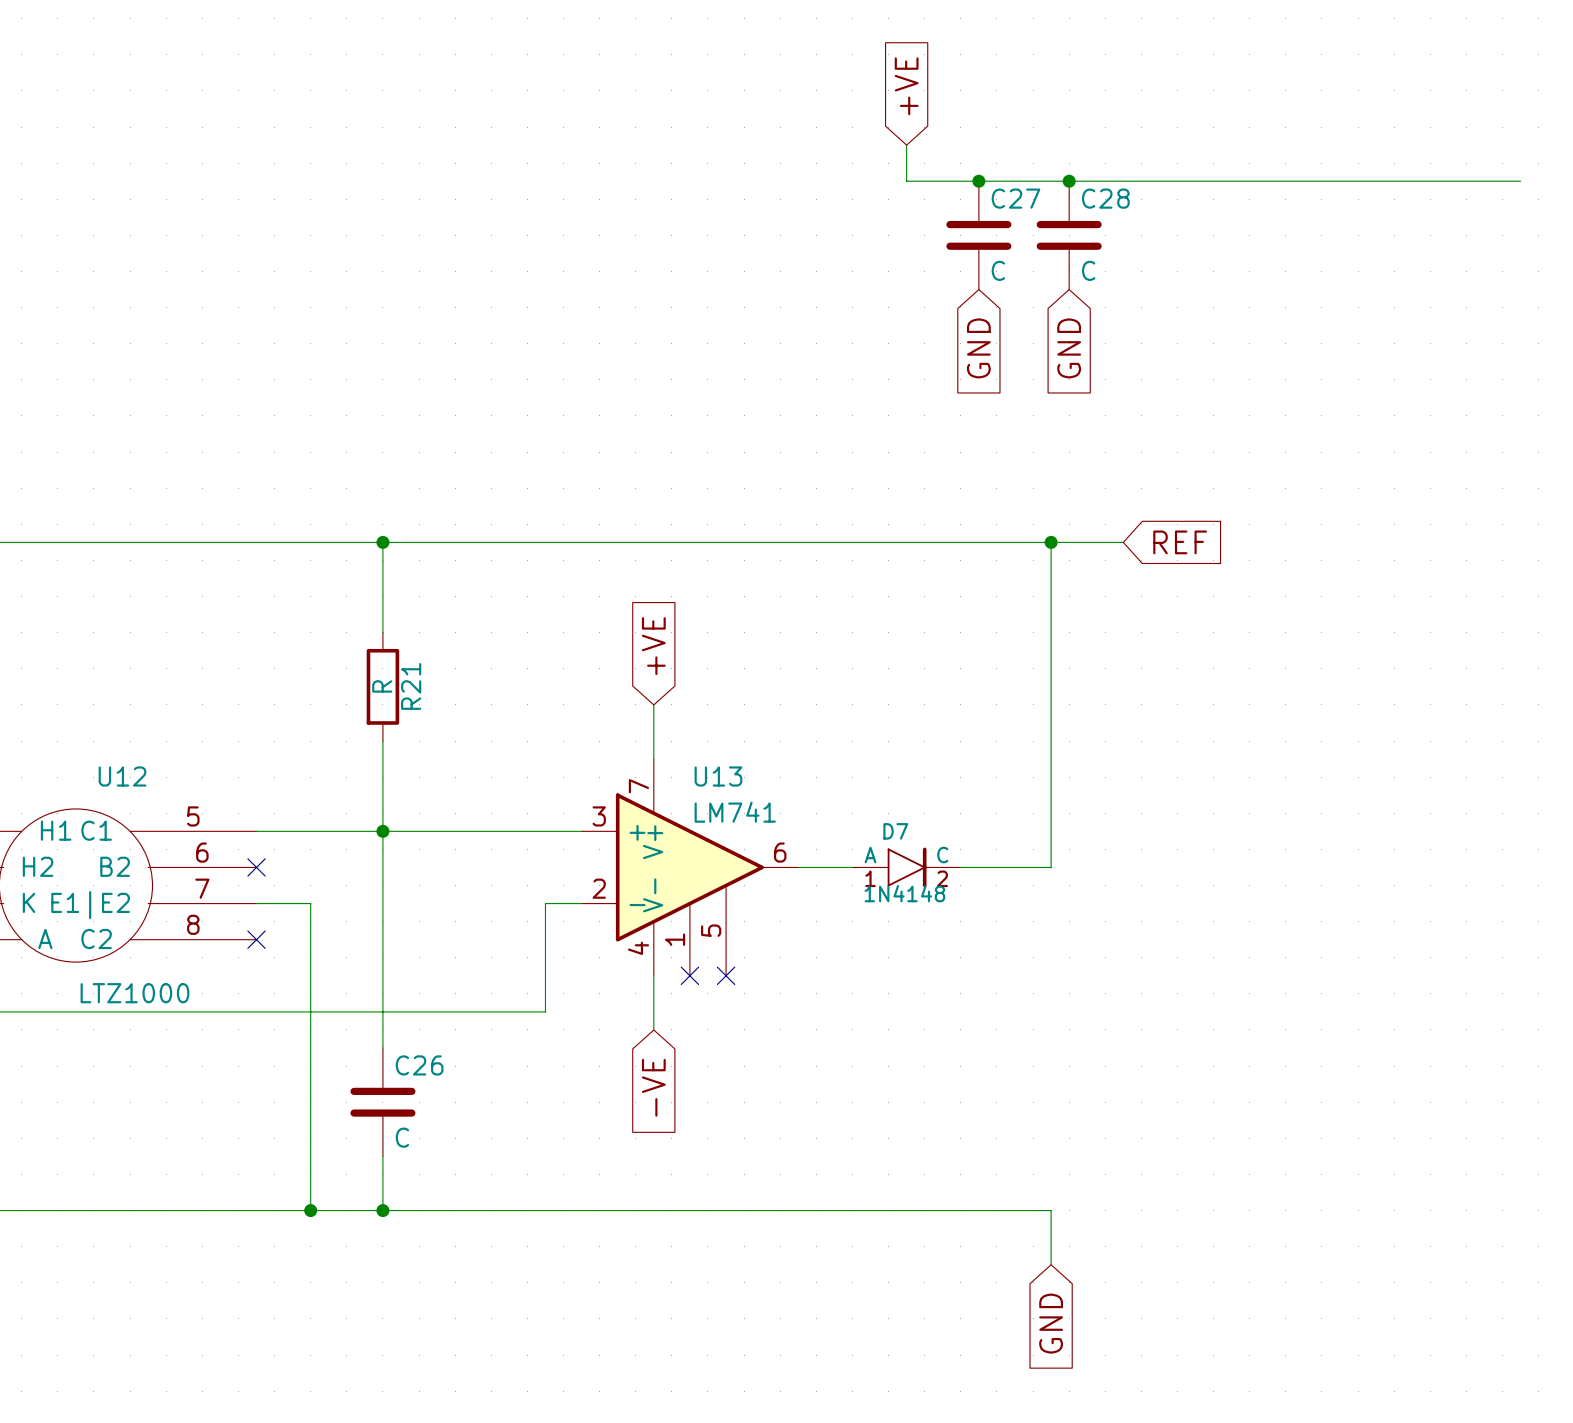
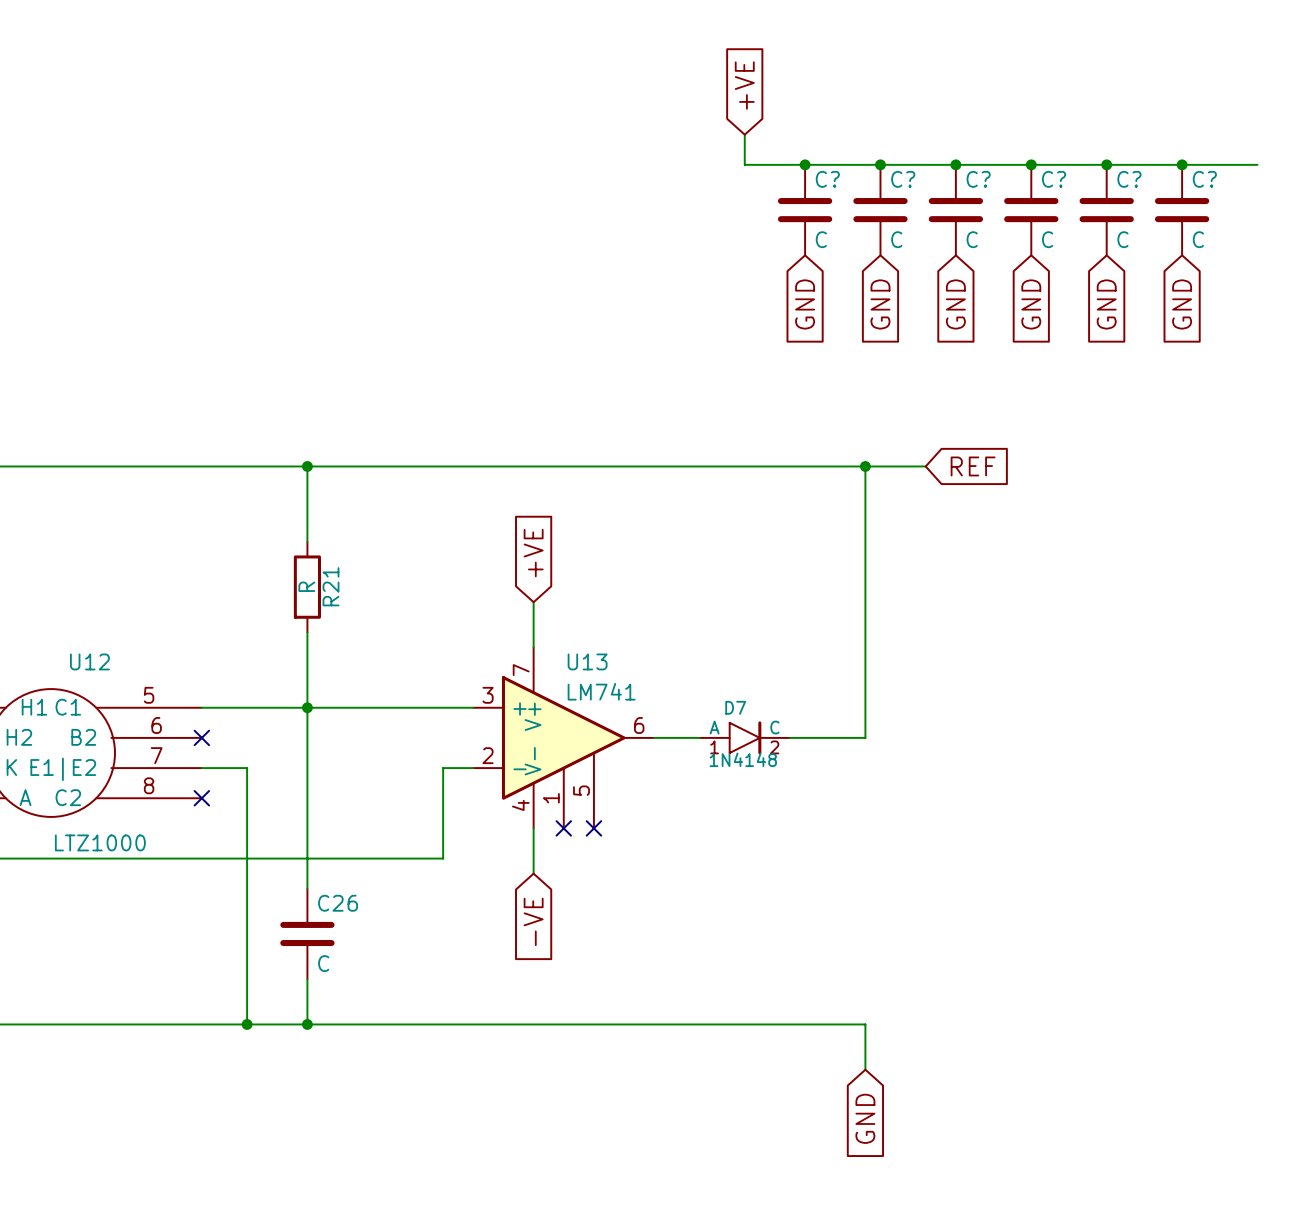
junction: none -> (955, 164)
junction: none -> (1031, 164)
junction: none -> (1106, 164)
junction: none -> (1182, 164)
C27 name: C27 (1015, 198) -> C? (827, 179)
C28 name: C28 (1105, 198) -> C? (903, 179)
C?: none -> C (955, 210)
C?: none -> C (1031, 210)
C?: none -> C (1106, 210)
C?: none -> C (1182, 210)
global label: none -> GND (955, 304)
global label: none -> GND (1031, 304)
global label: none -> GND (1106, 304)
global label: none -> GND (1182, 304)

